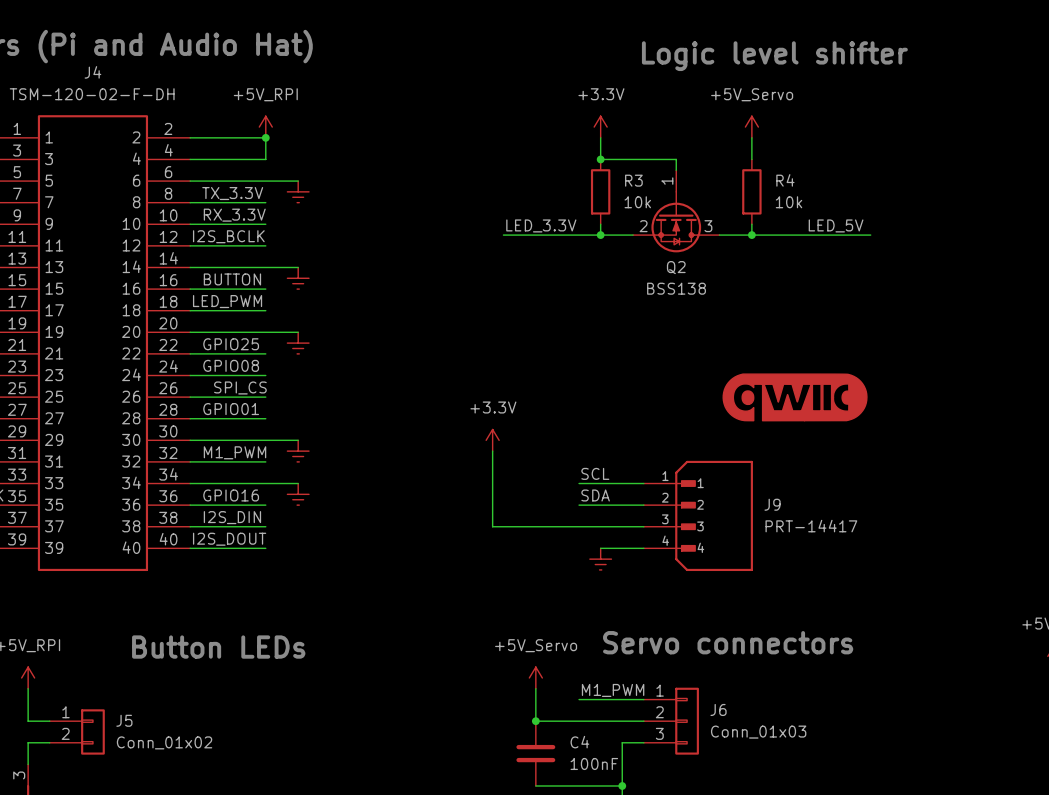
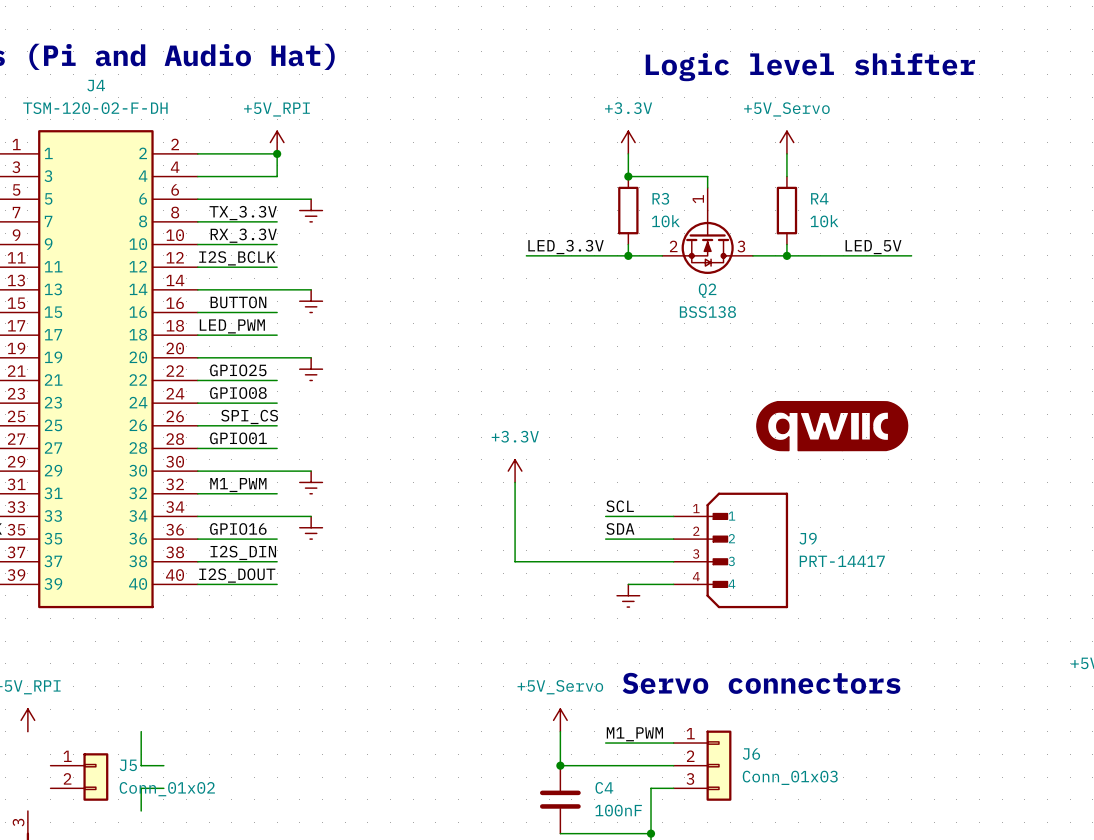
text: Button LEDs (218, 647) -> none
wire: (28, 688) (28, 721) (49, 721) -> (141, 731) (141, 765) (163, 765)
wire: (49, 742) (28, 742) (28, 764) -> (163, 788) (141, 788) (141, 810)

